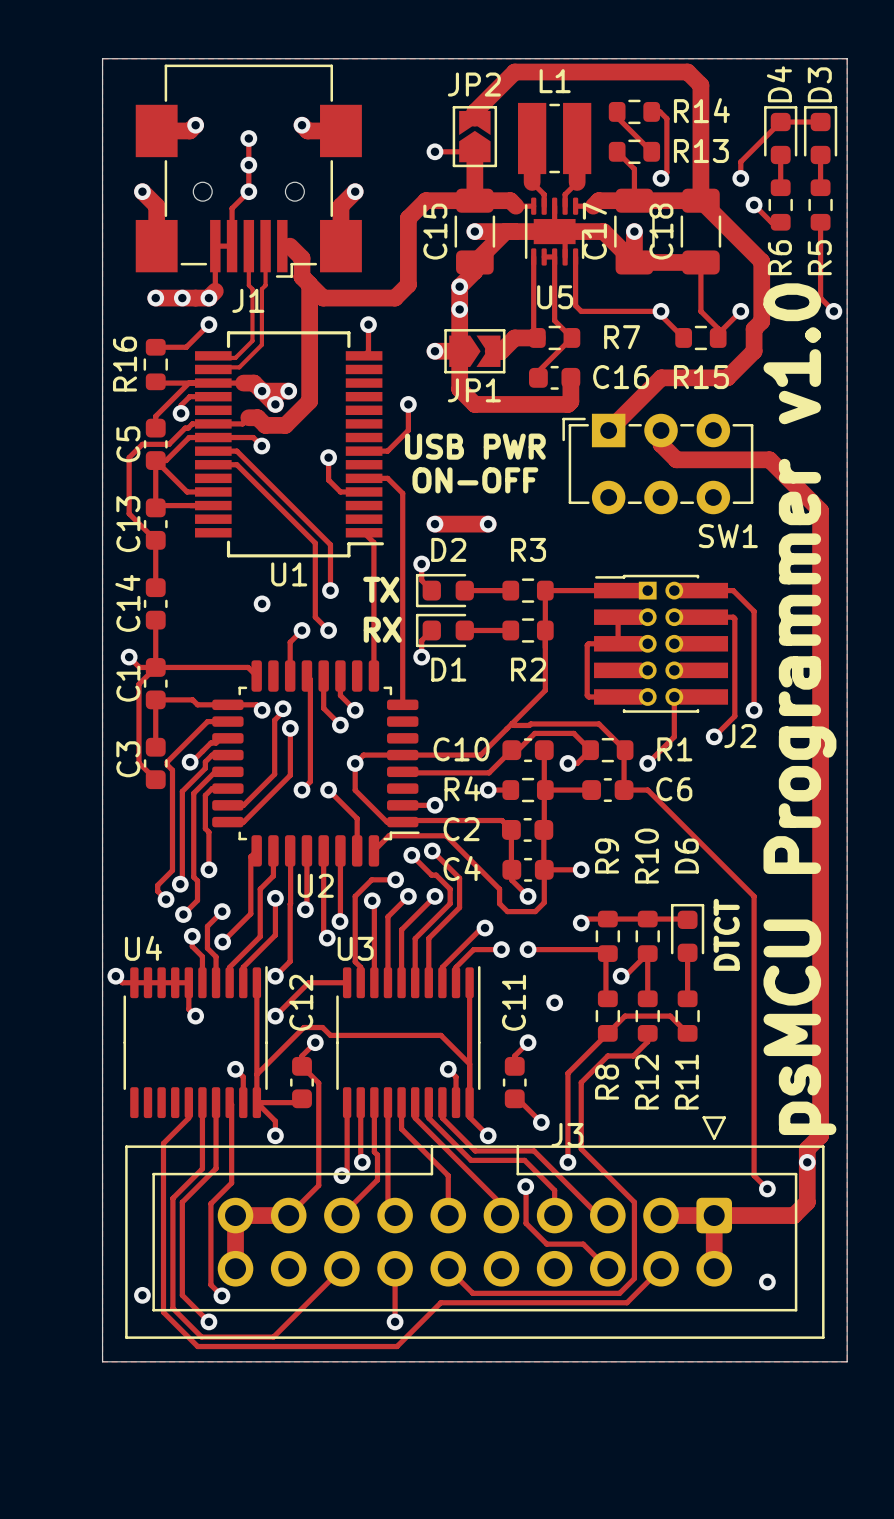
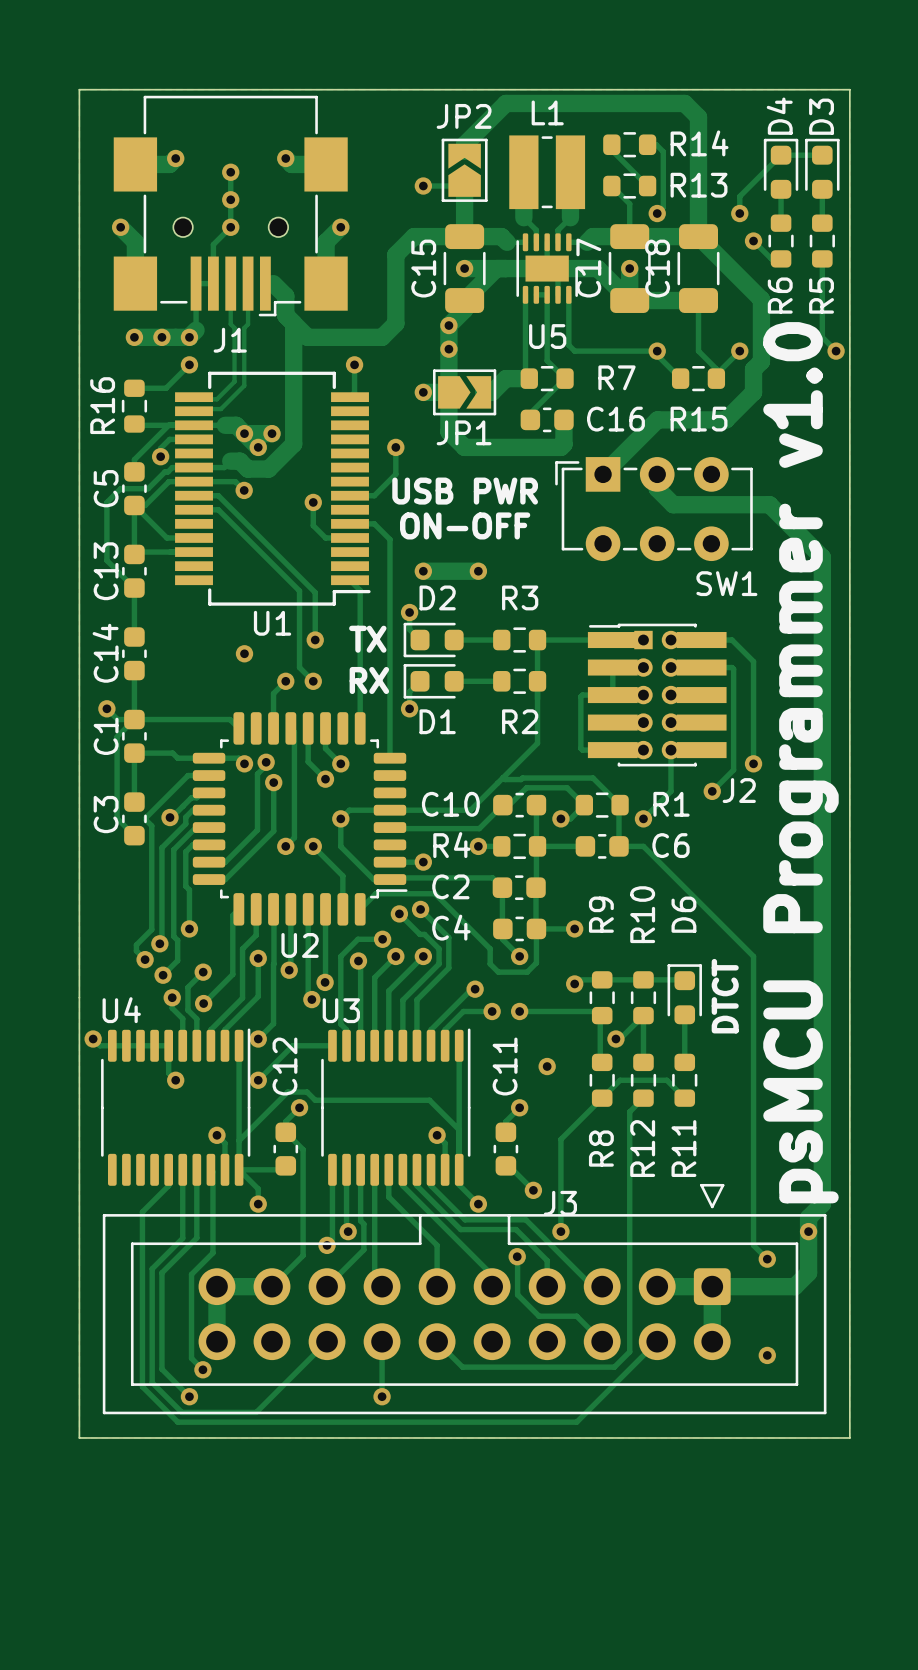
track: (647, 1033) (647, 1041) (633, 1055) (607, 1055) (581, 1082) (581, 1149) (634, 1202) -> (643, 1098) (629, 1111) (629, 1272)
via: (142, 1295) -> none
track: (626, 1302) (440, 1302) (397, 1346) -> (622, 1376) (576, 1422) (384, 1422)

